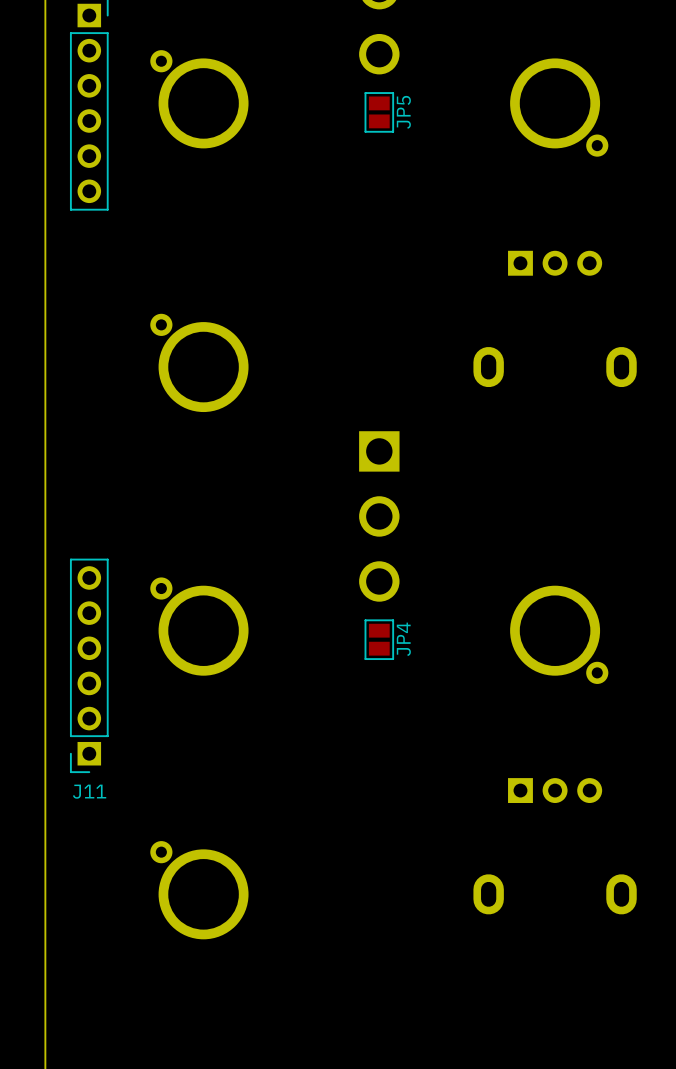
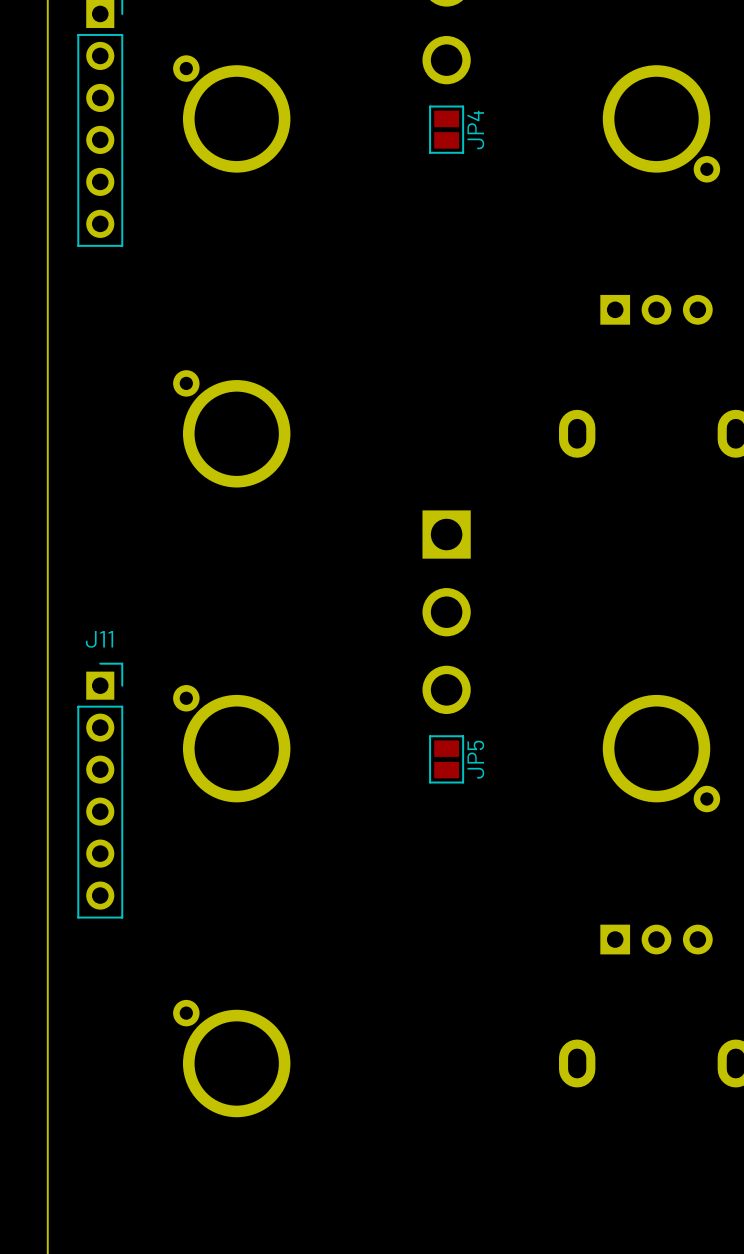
JP5 name: JP5 (403, 112) -> JP4 (475, 130)
JP4 name: JP4 (403, 639) -> JP5 (475, 759)
J11 rotation: 0° (89, 665) -> 180° (100, 790)

